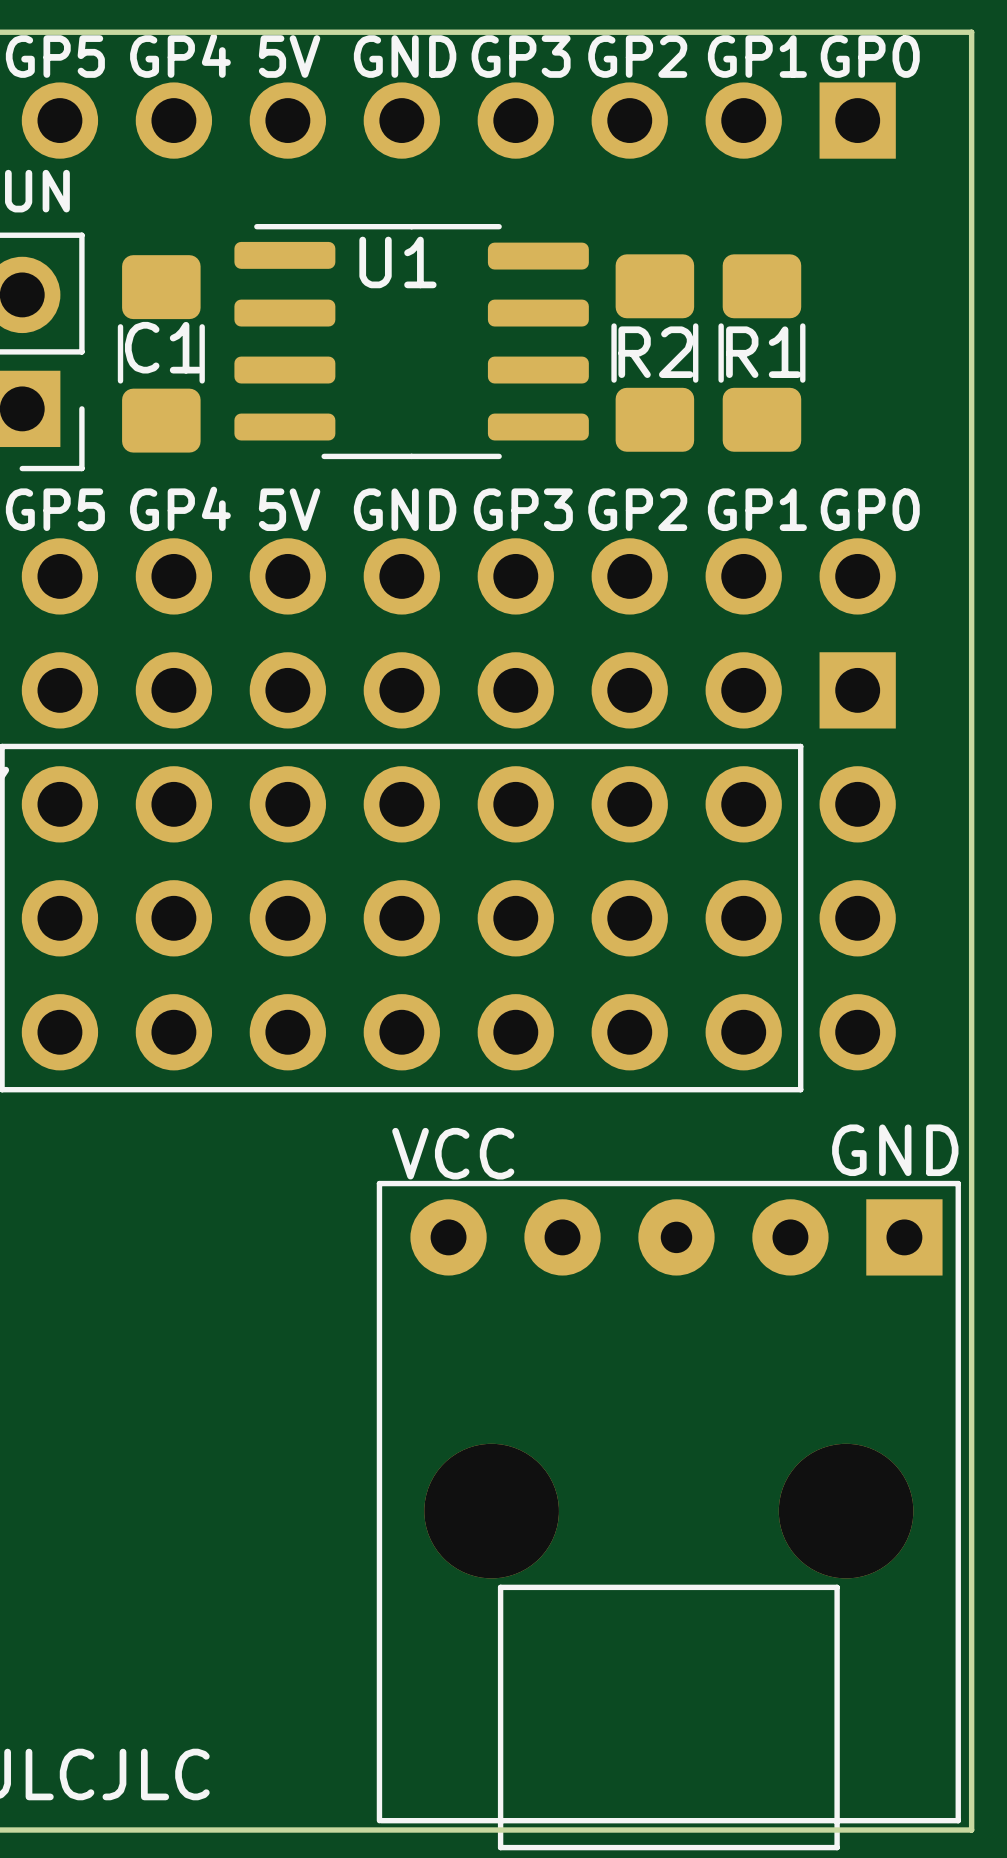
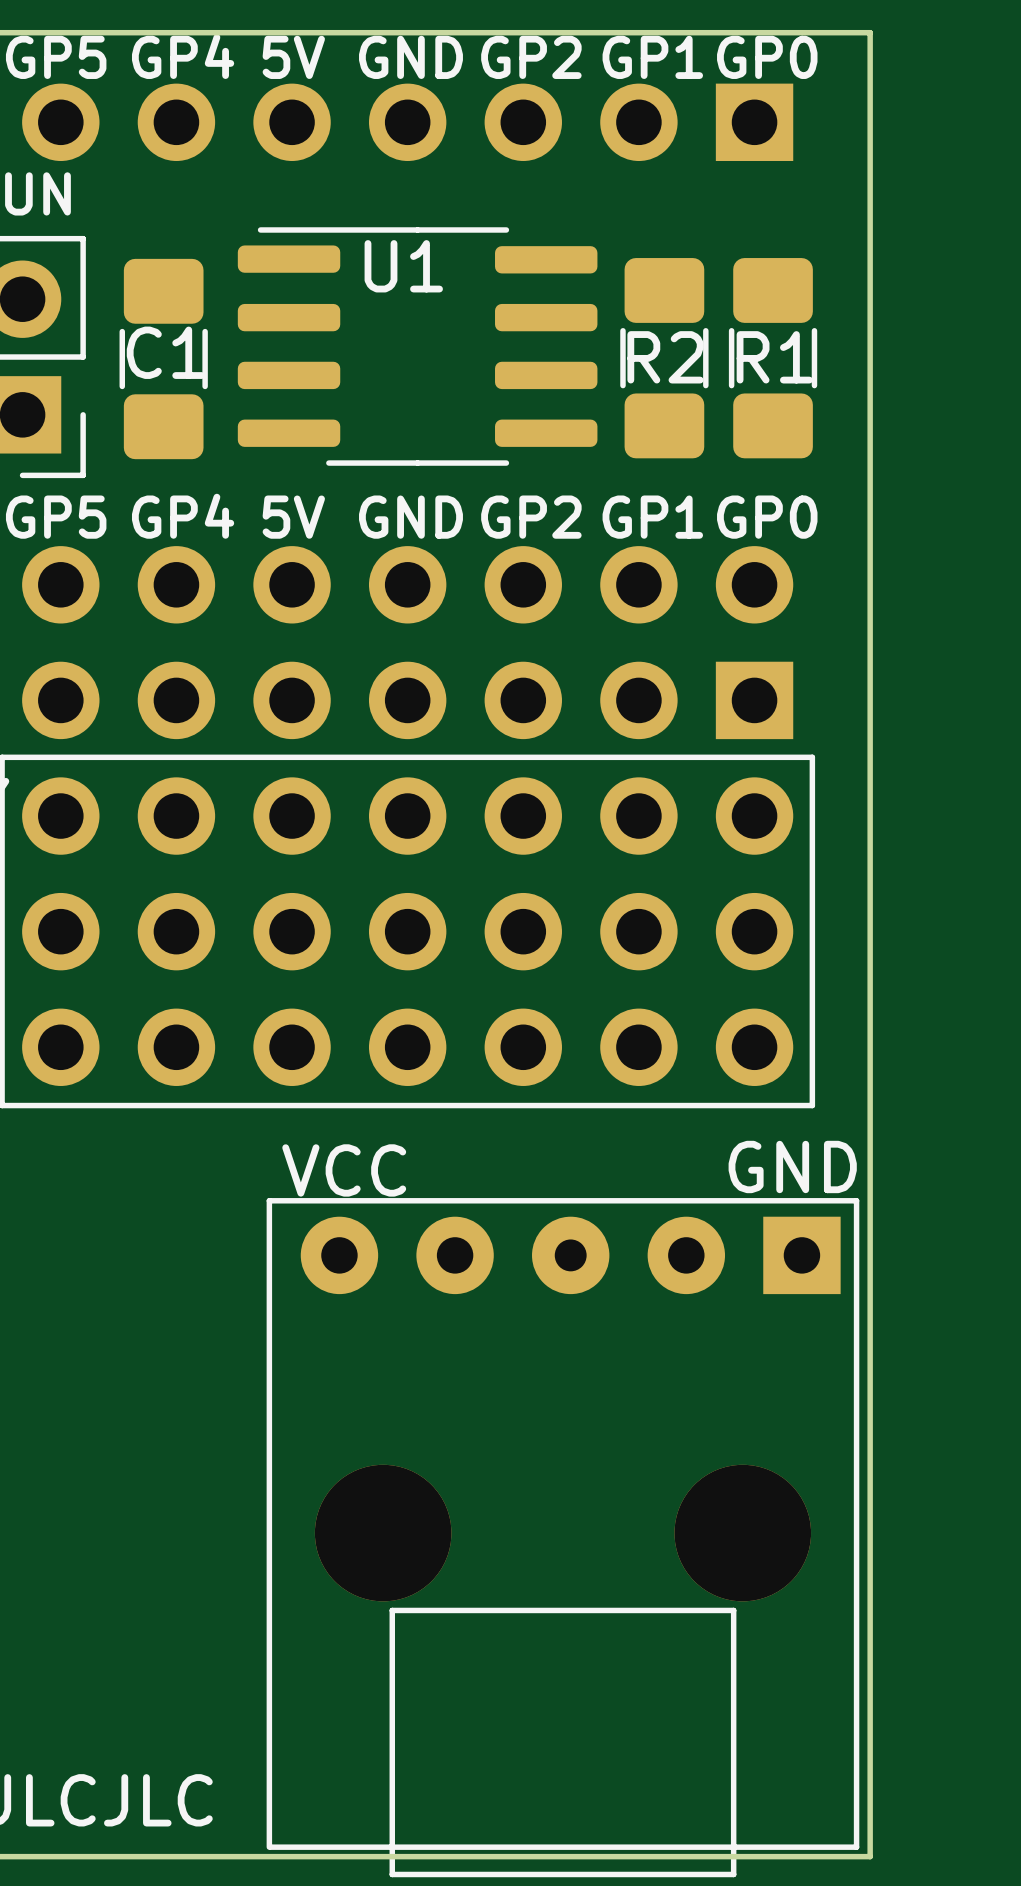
board edge: (857, 32) (971, 32) (971, 1830) (857, 1830) -> (870, 32) (870, 1856)
text: GP3 (521, 56) -> GP2 (531, 57)
text: GP2 (637, 56) -> GP1 (652, 57)
text: GP1 (757, 56) -> GP0 (767, 57)
text: GP0 (870, 56) -> none
part: none -> (407, 122)
part: (458, 120) -> none
text: GP3 (523, 509) -> GP2 (531, 517)
text: GP2 (637, 509) -> GP1 (652, 517)
text: GP1 (757, 509) -> GP0 (767, 517)
text: GP0 (870, 509) -> none
part: none -> (407, 642)
part: (458, 633) -> none
part: (458, 918) -> none
part position: (668, 1515) -> (562, 1537)

